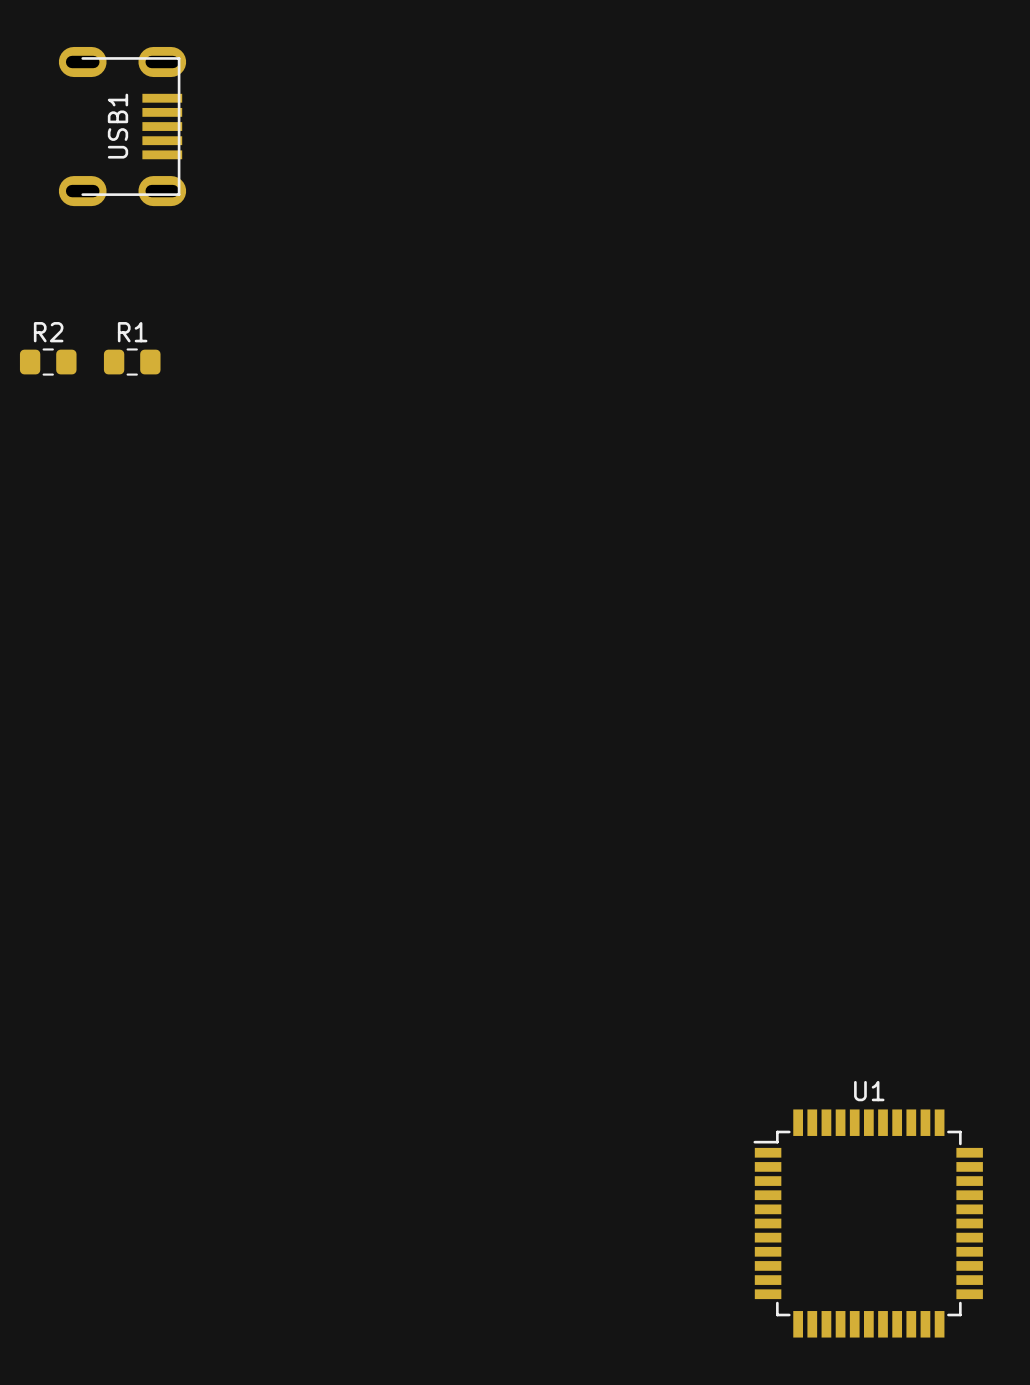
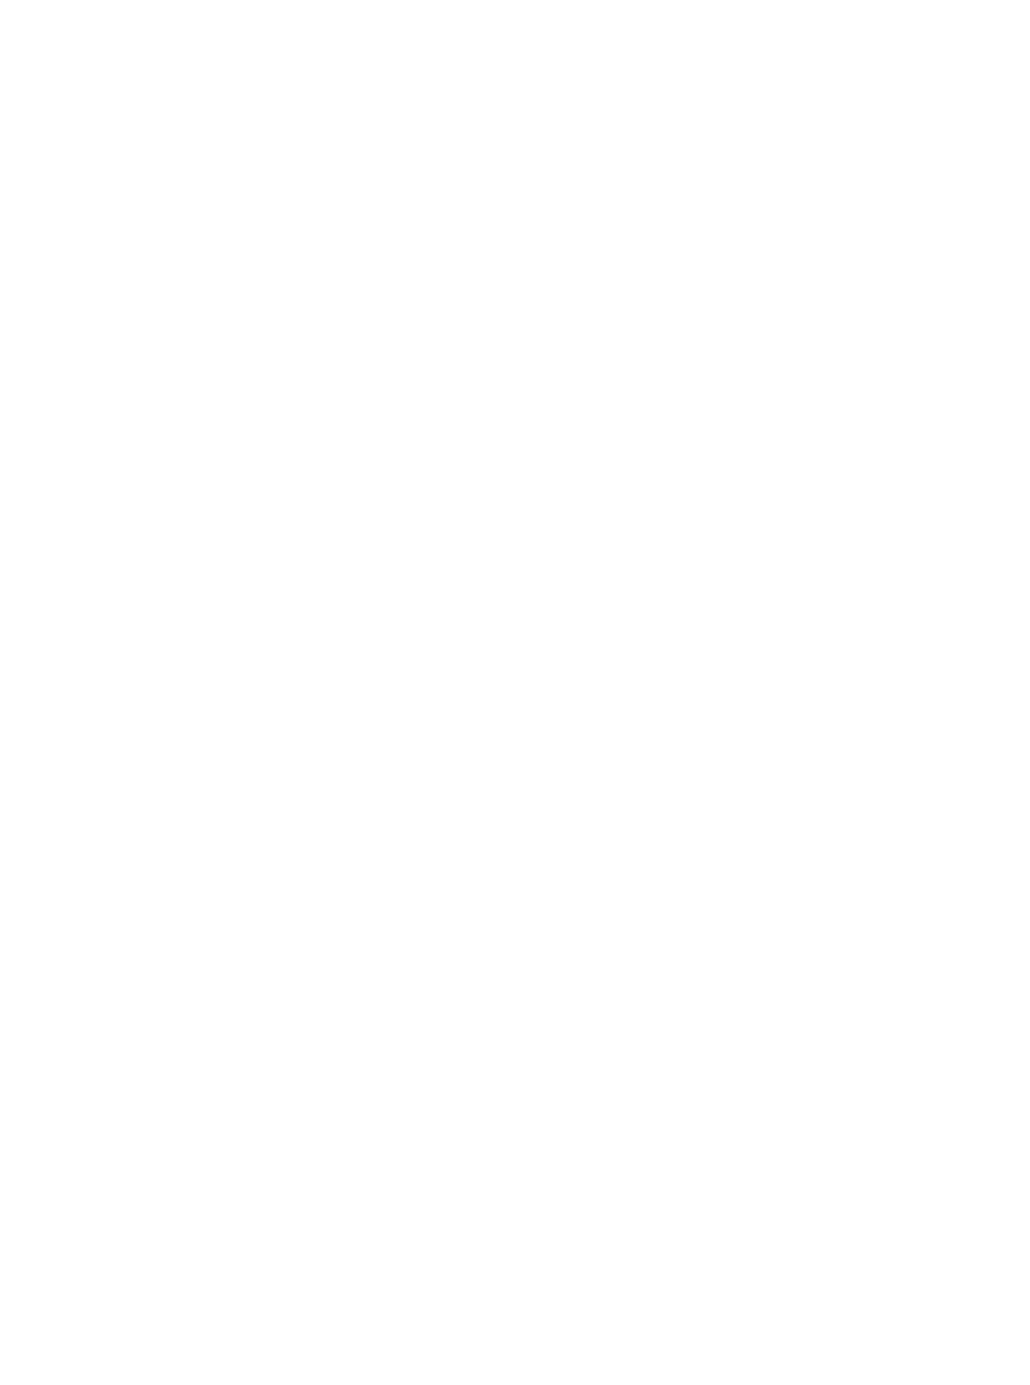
USB1: (122, 126) -> none
R2: (48, 362) -> none
R1: (132, 362) -> none
U1: (868, 1223) -> none

